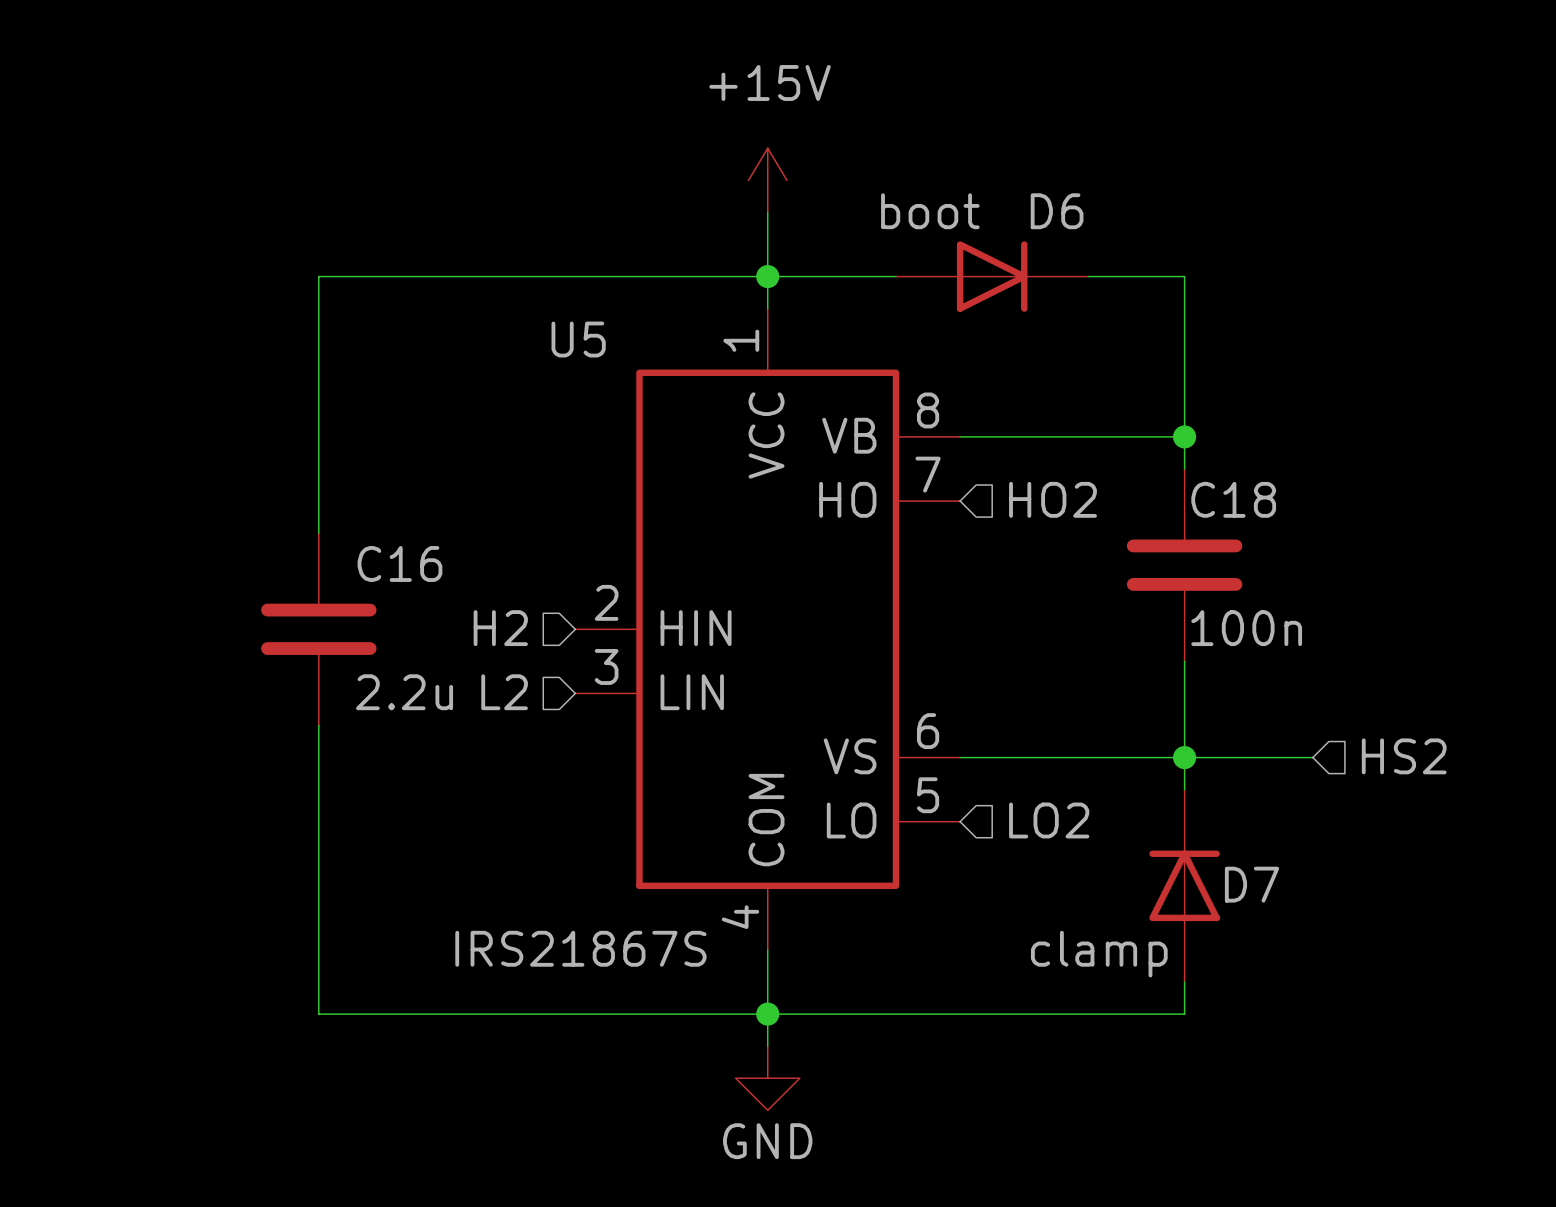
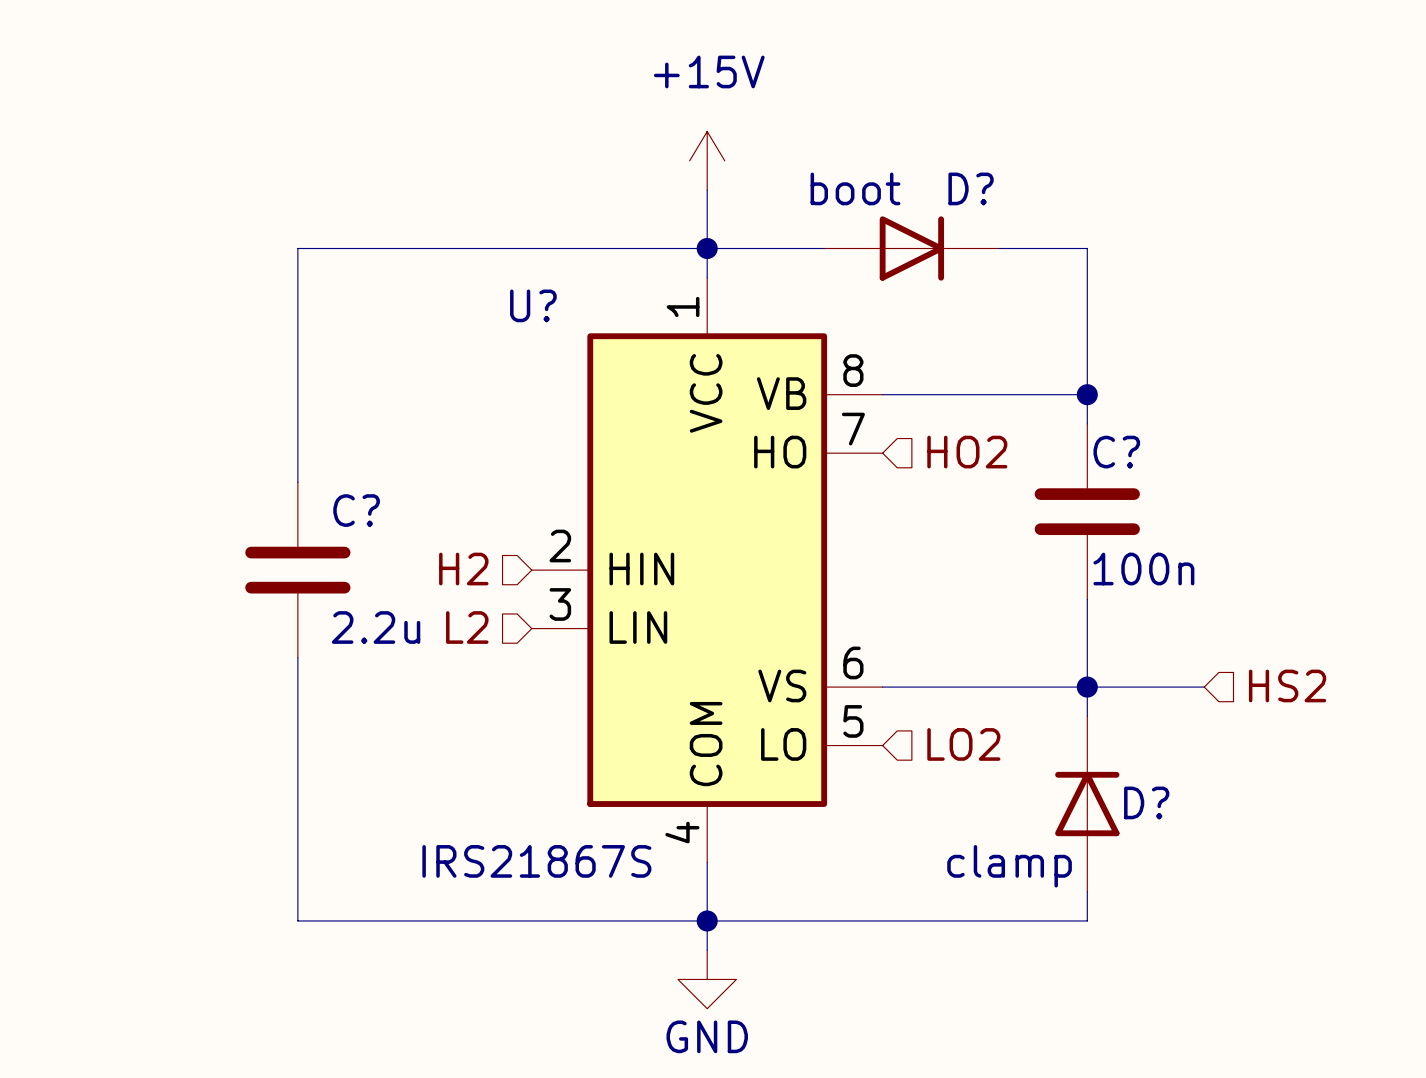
D6 name: D6 (1057, 211) -> D? (971, 188)
U5 name: U5 (578, 339) -> U? (533, 305)
C18 name: C18 (1233, 499) -> C? (1116, 452)
C16 name: C16 (399, 563) -> C? (356, 510)
D7 name: D7 (1252, 884) -> D? (1146, 802)

